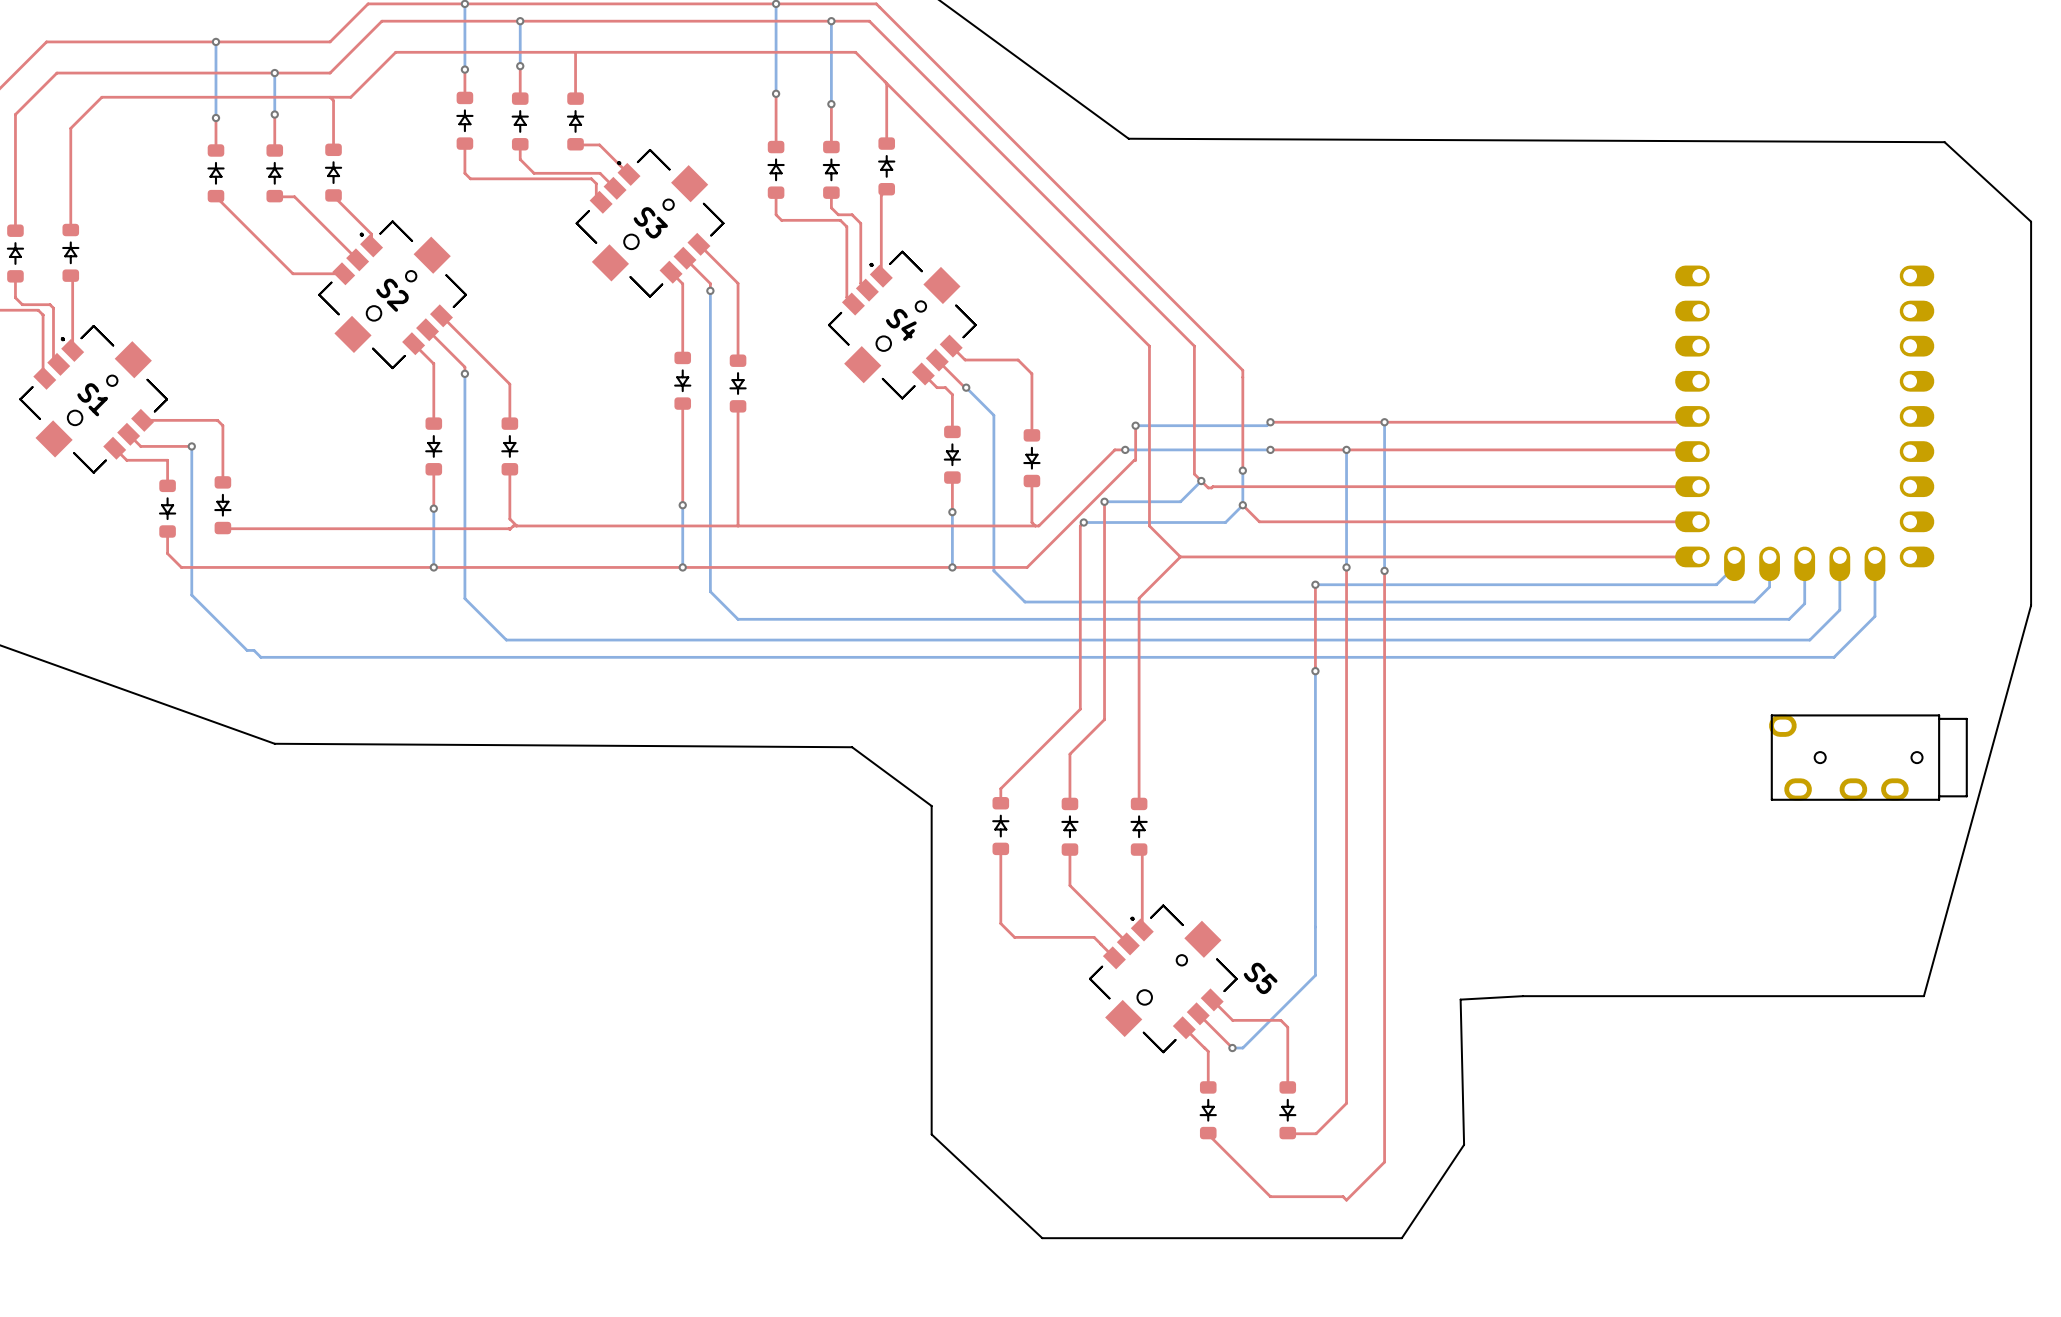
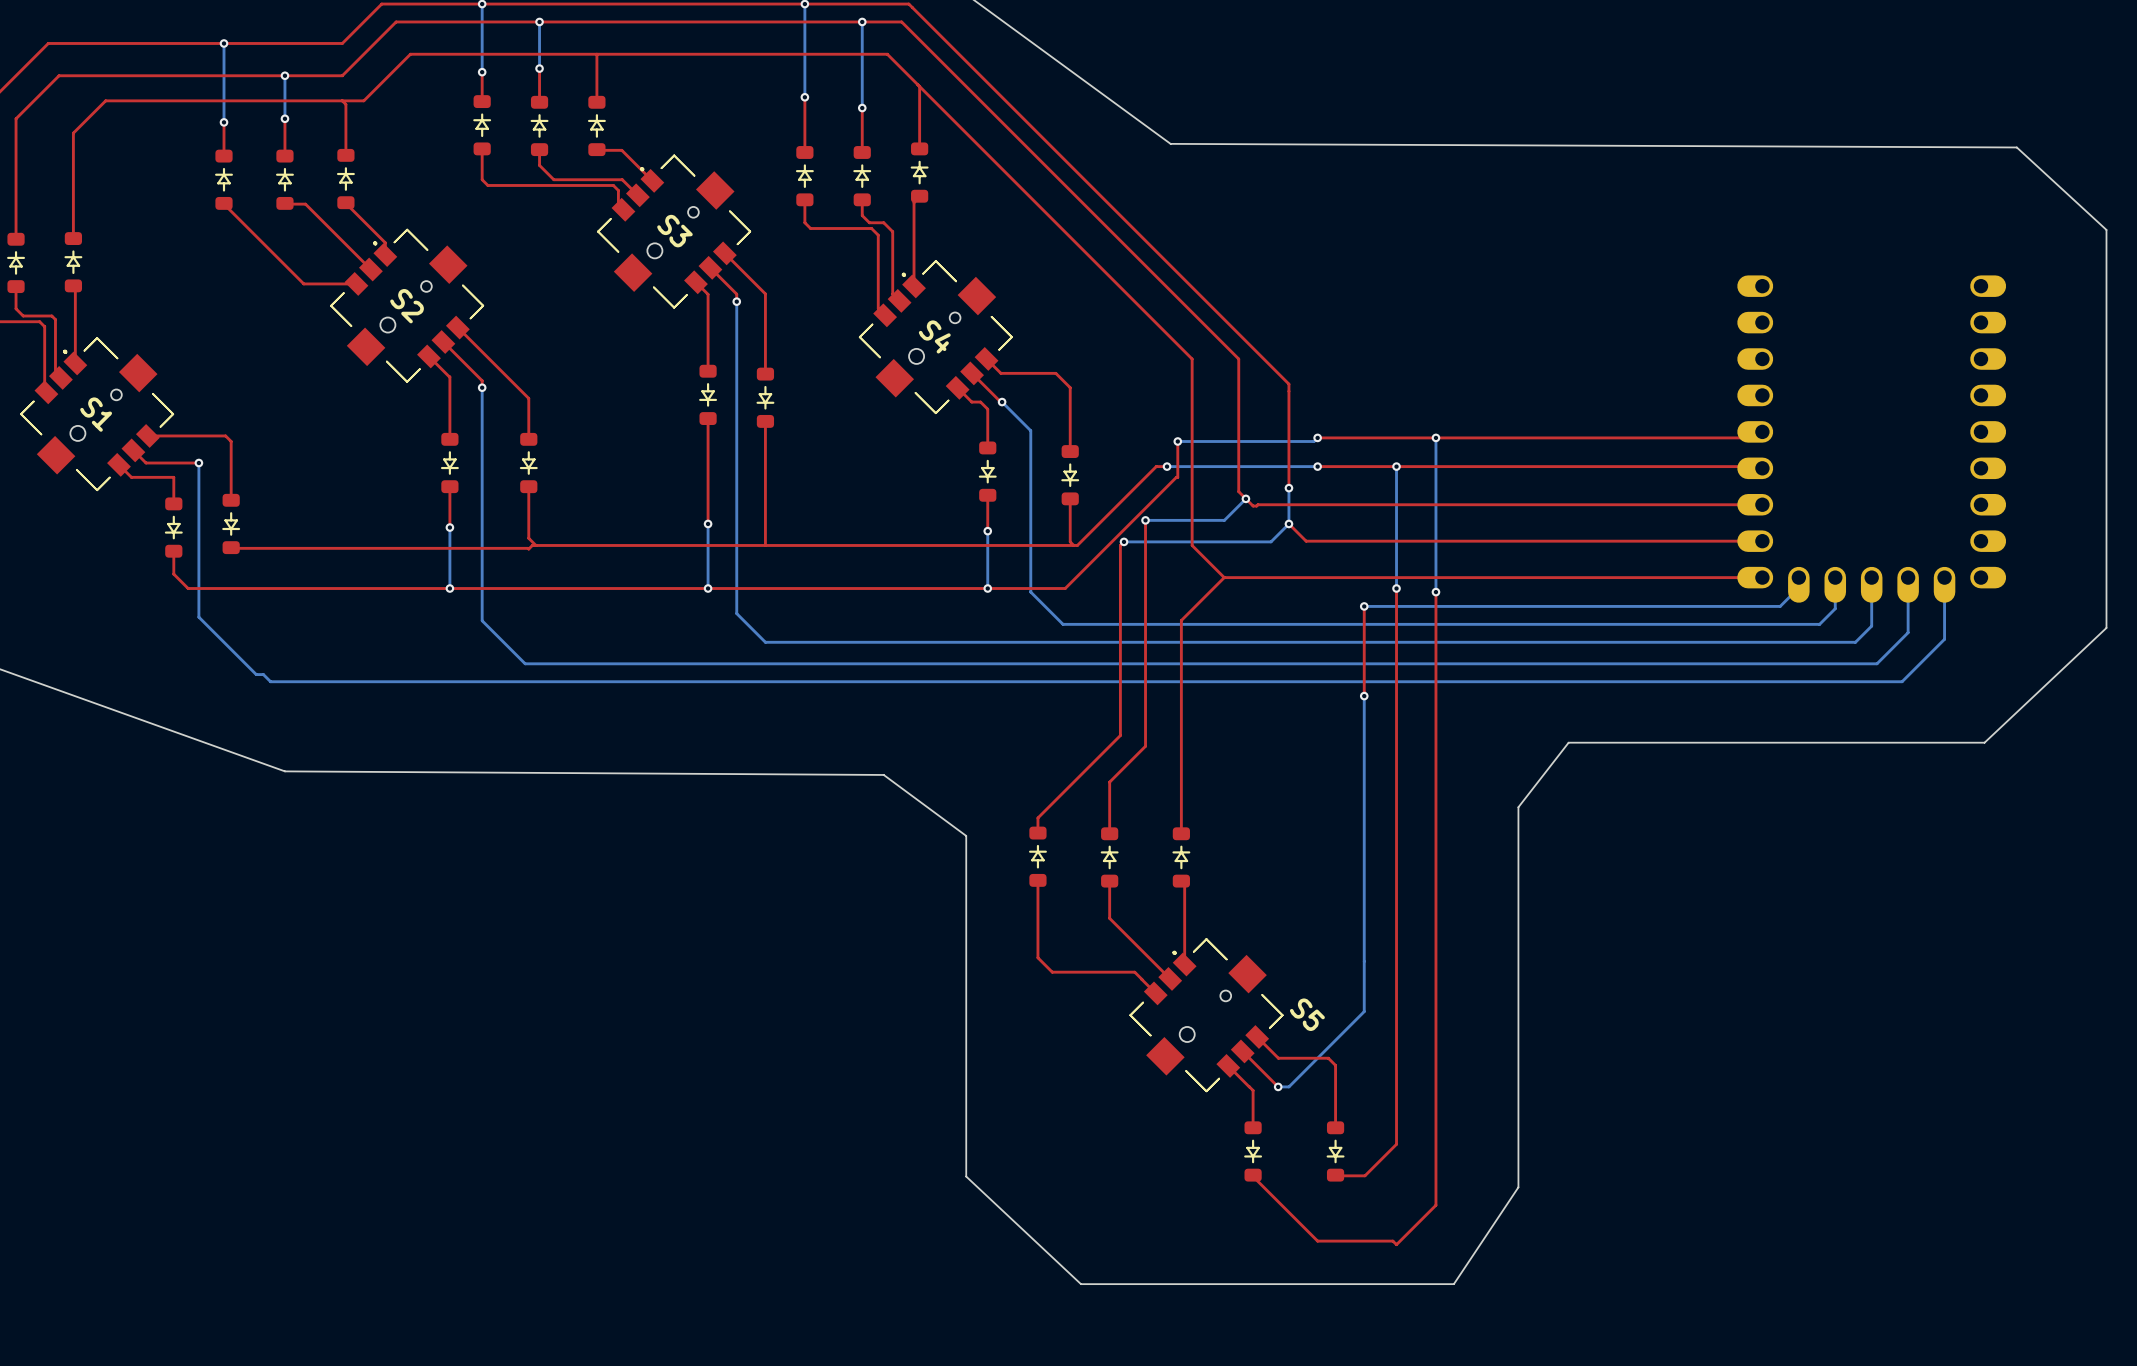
board edge: (2031, 605) (1923, 996) (1522, 996) (1460, 999) (1464, 1144) -> (2106, 627) (1984, 742) (1568, 742) (1518, 807) (1518, 1187)
part: (1868, 757) -> none

